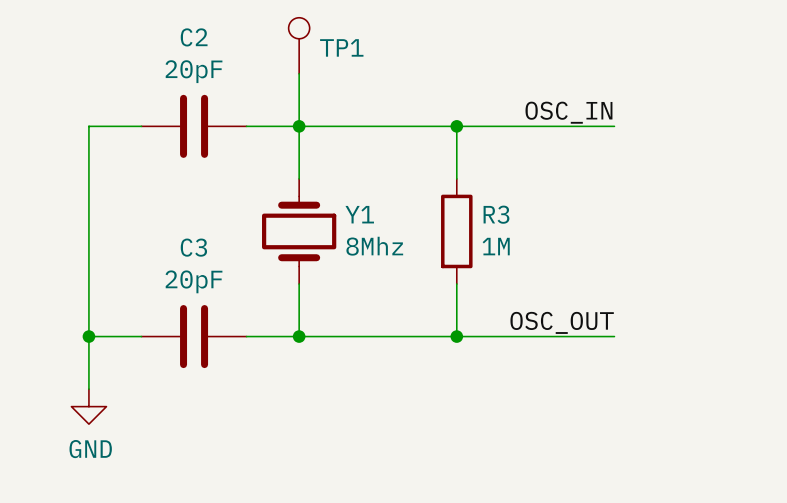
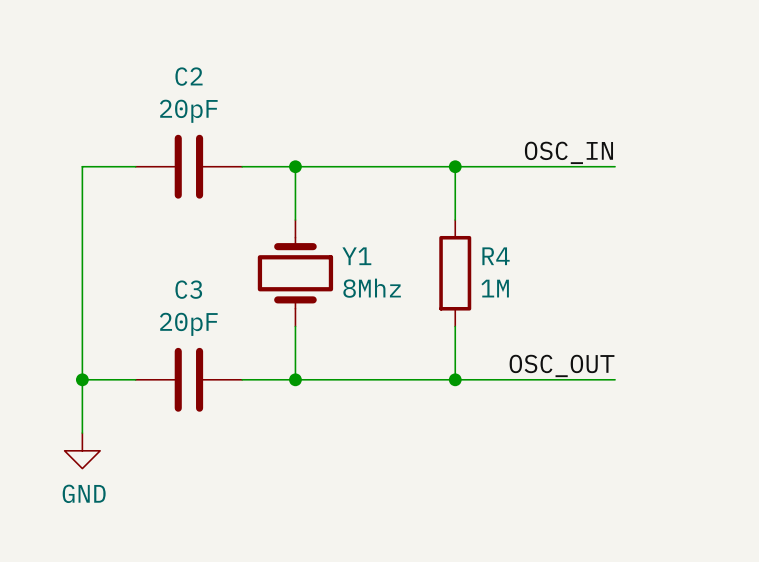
TP1: (299, 45) -> none
wire: (299, 73) (299, 126) -> none
R3 name: R3 (496, 214) -> R4 (496, 256)

